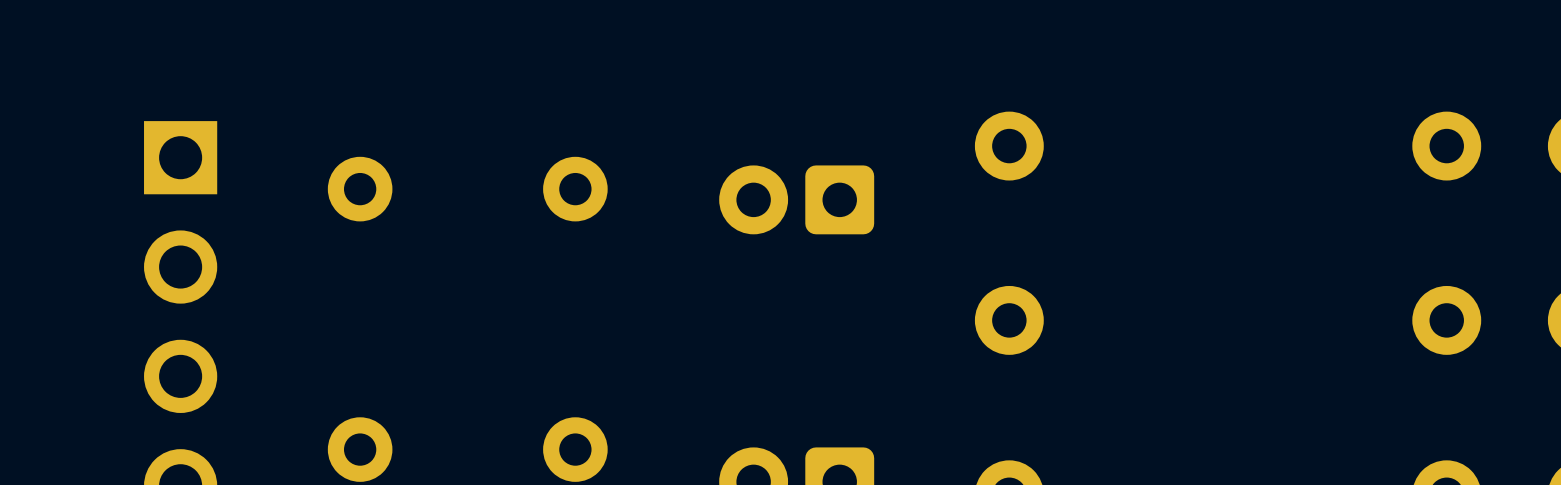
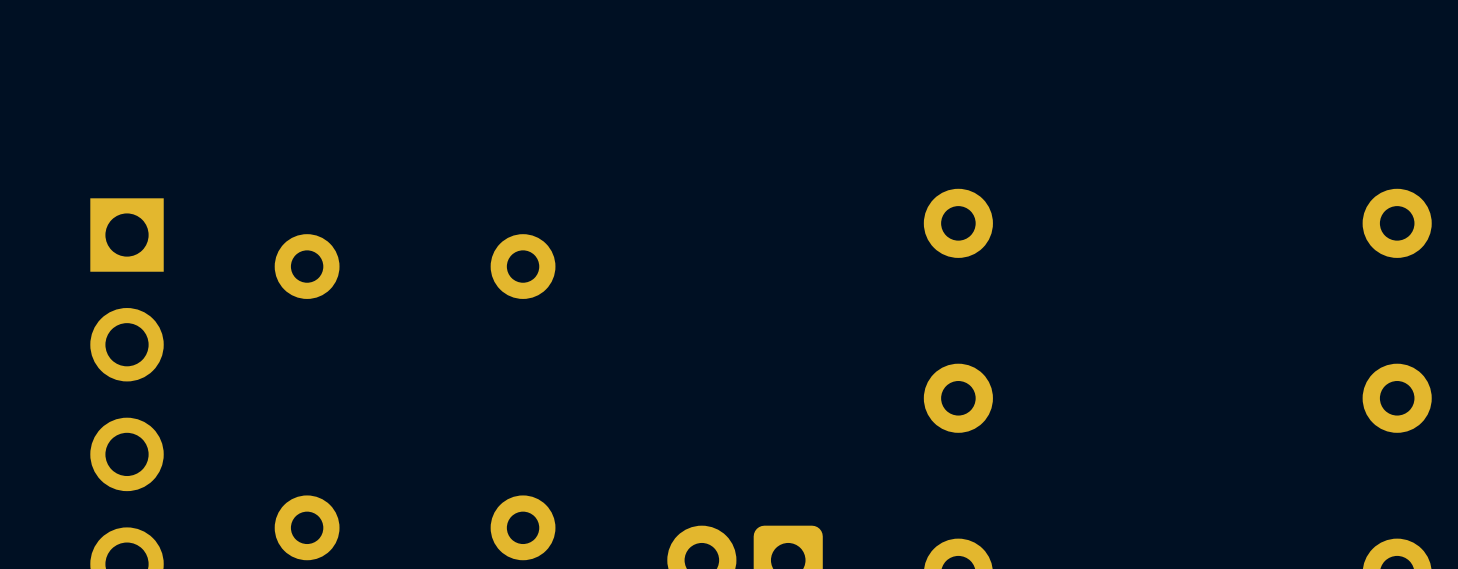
part: (796, 199) -> none

